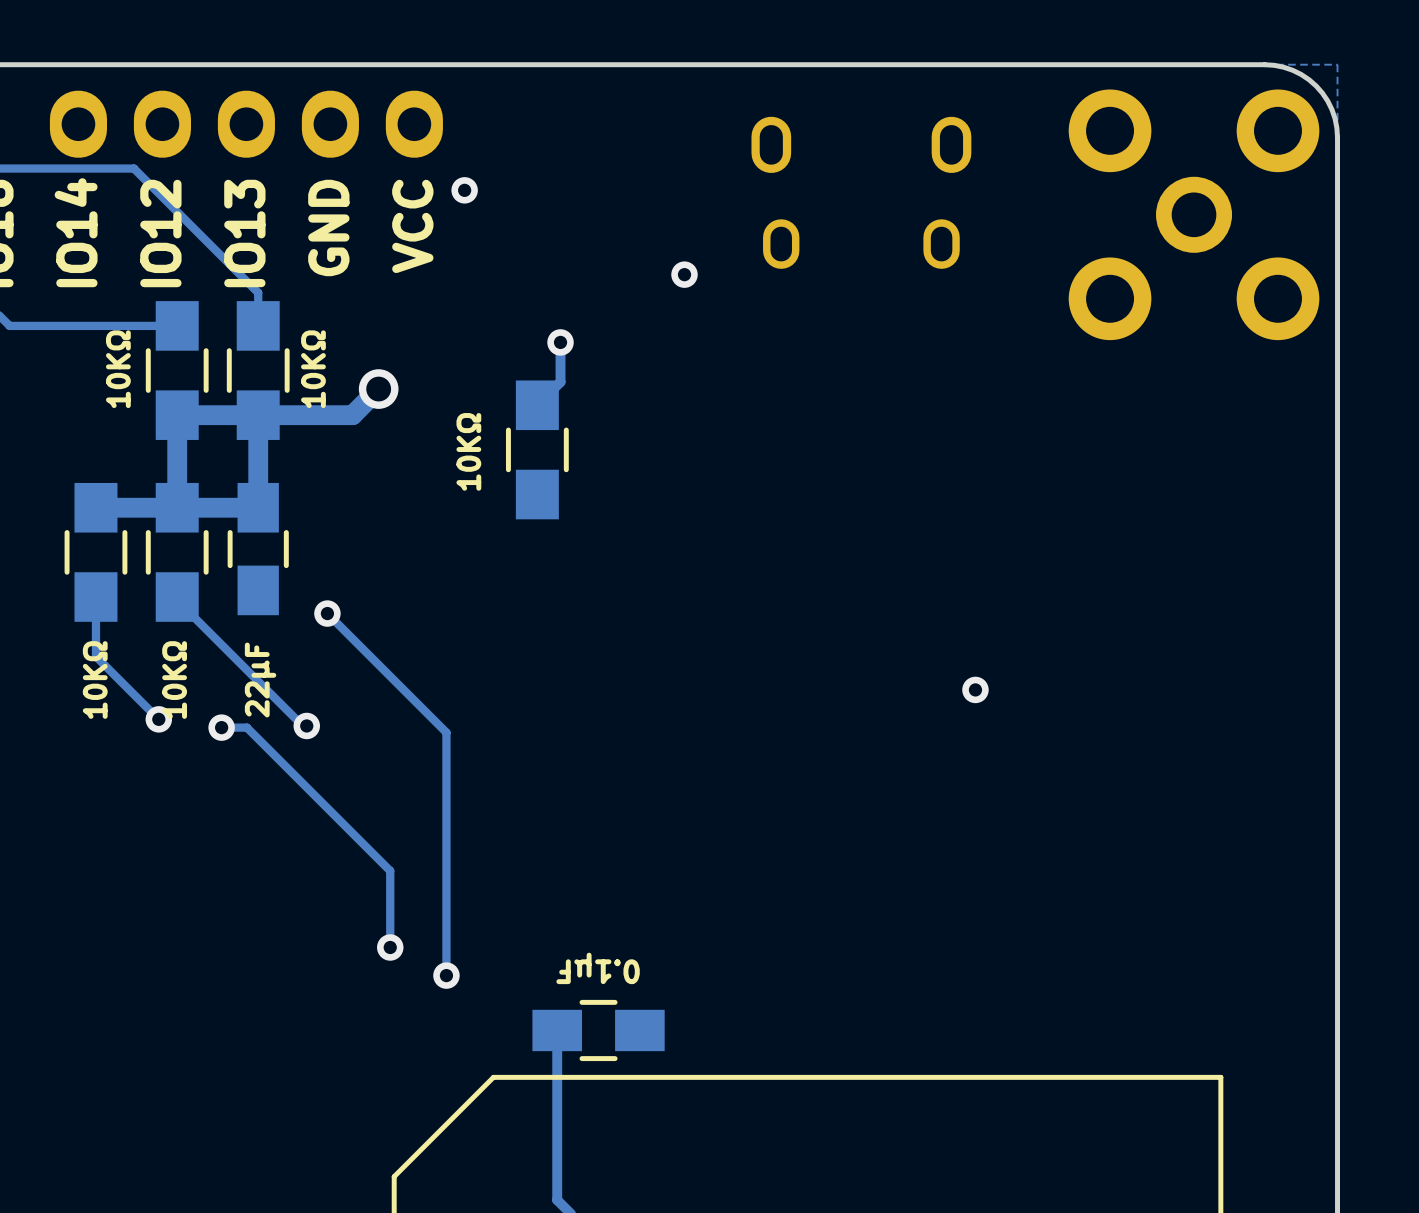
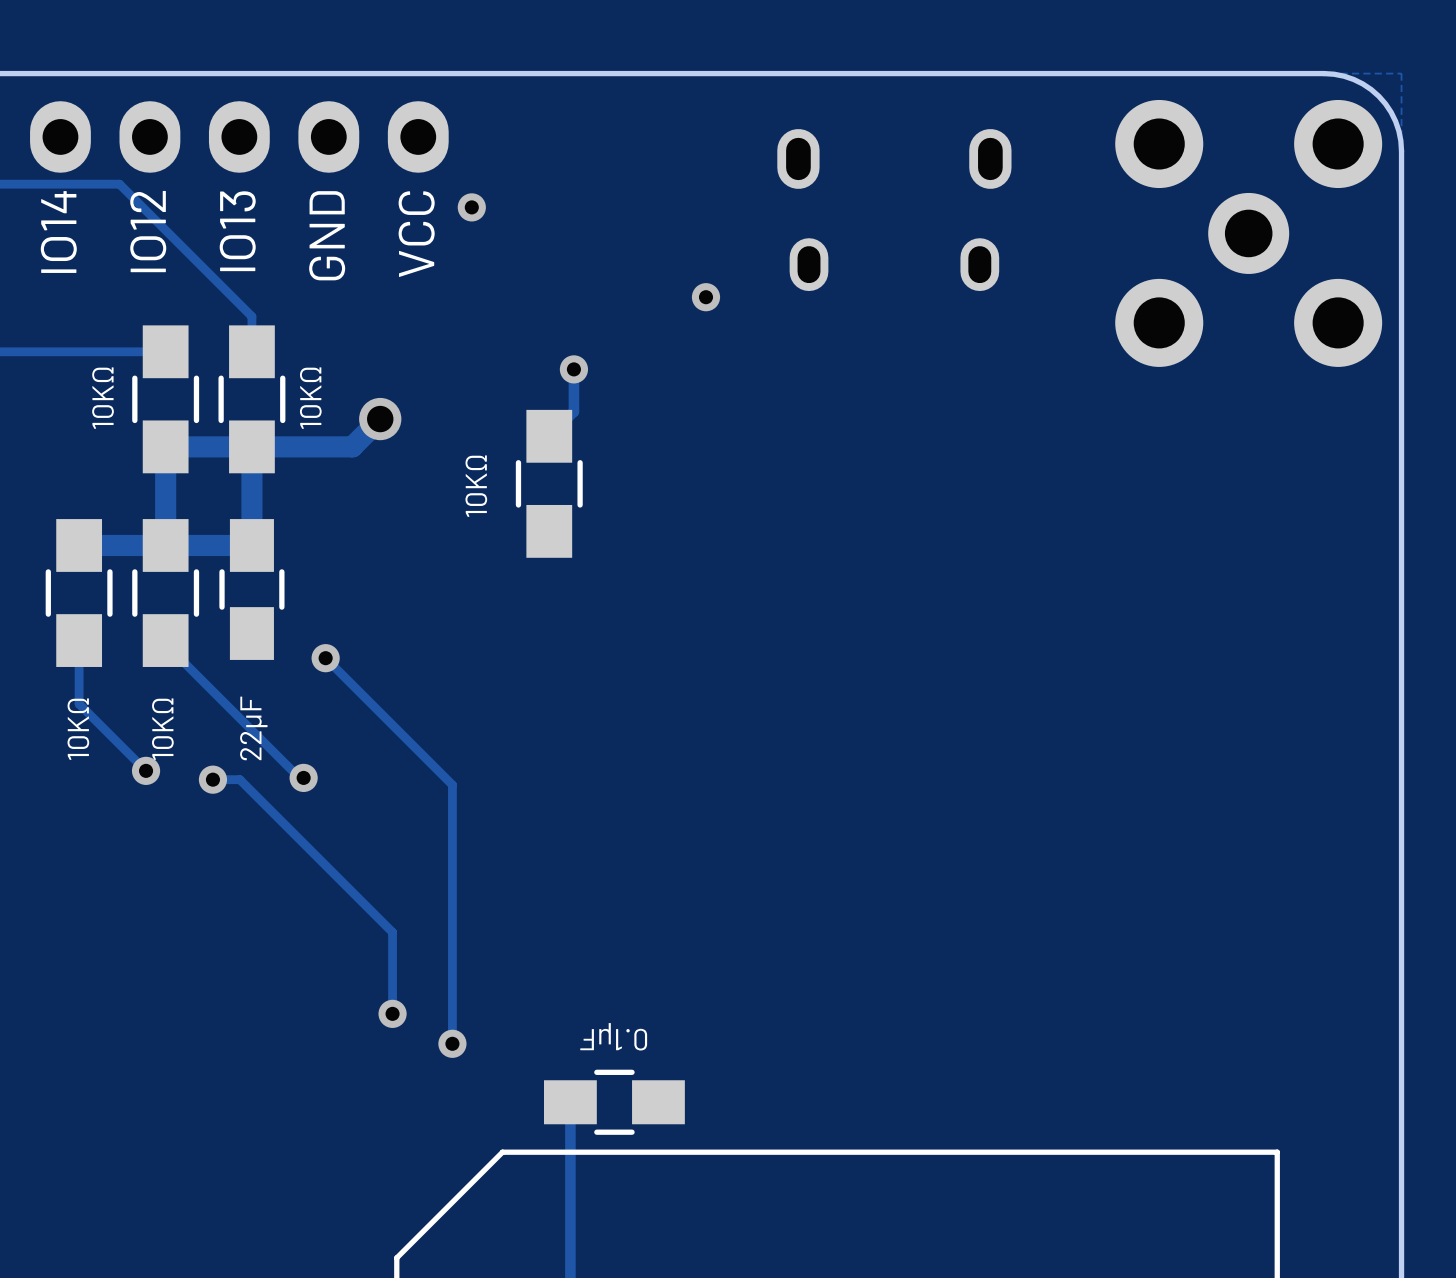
via: (975, 689) -> none

